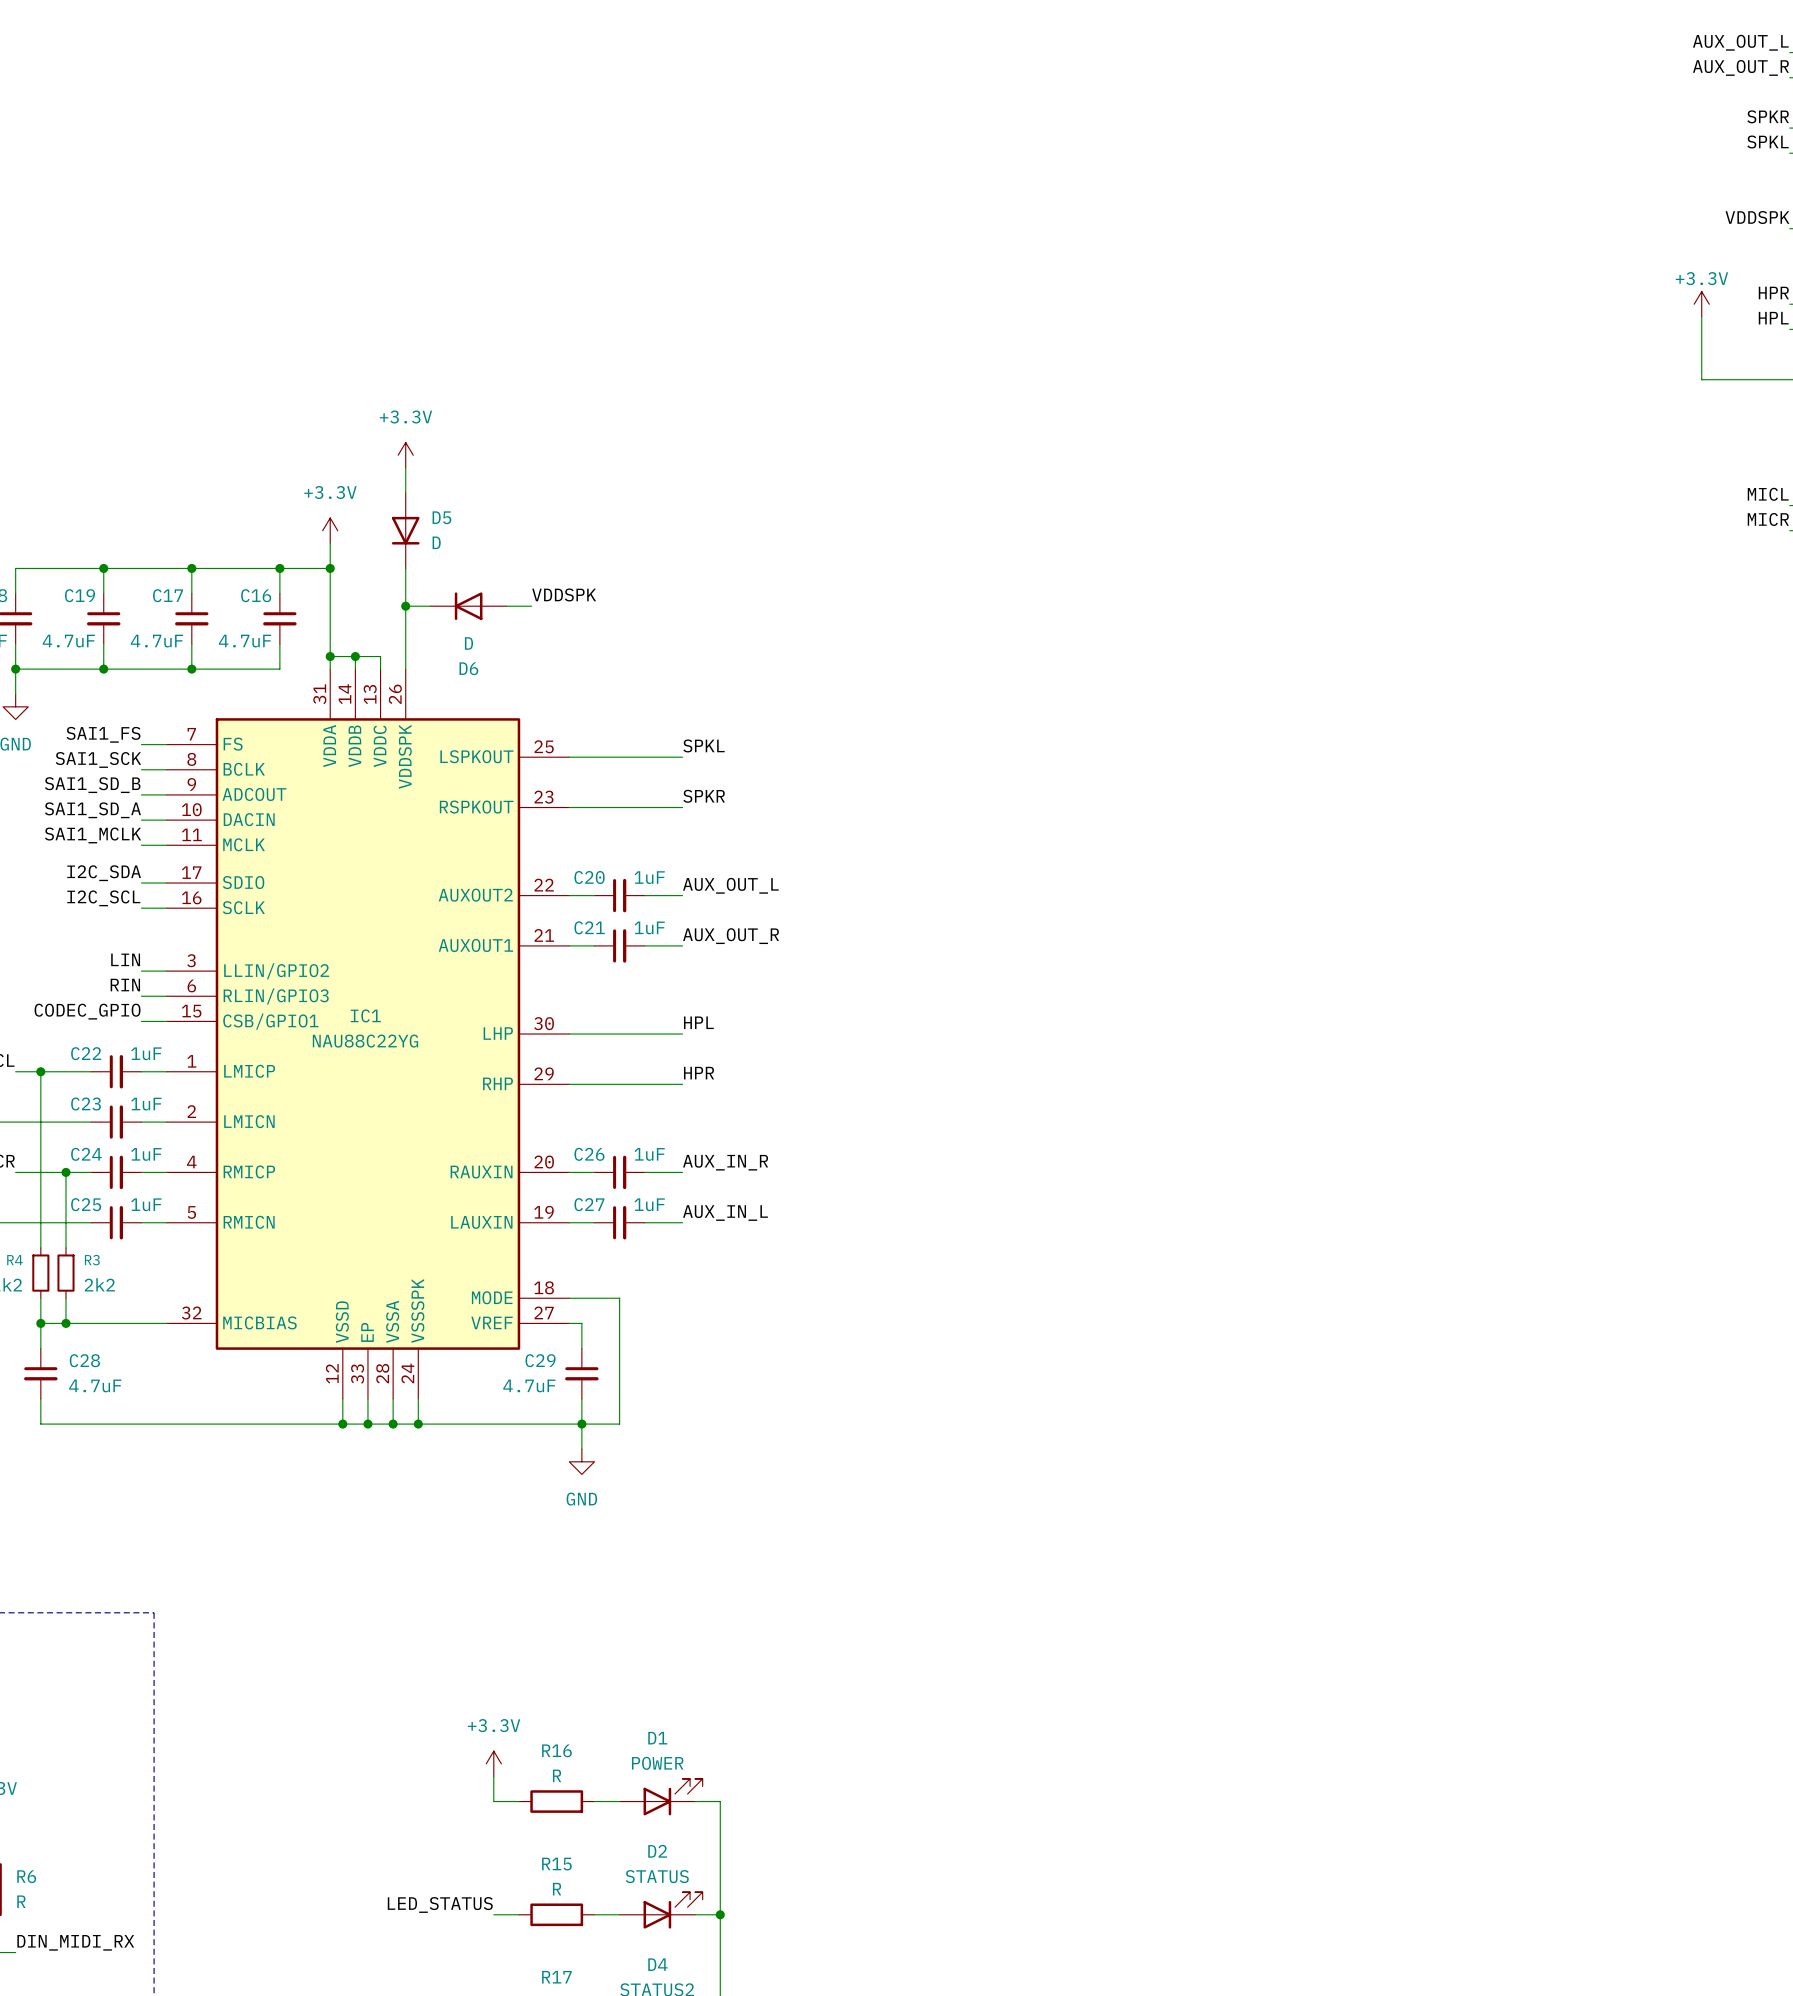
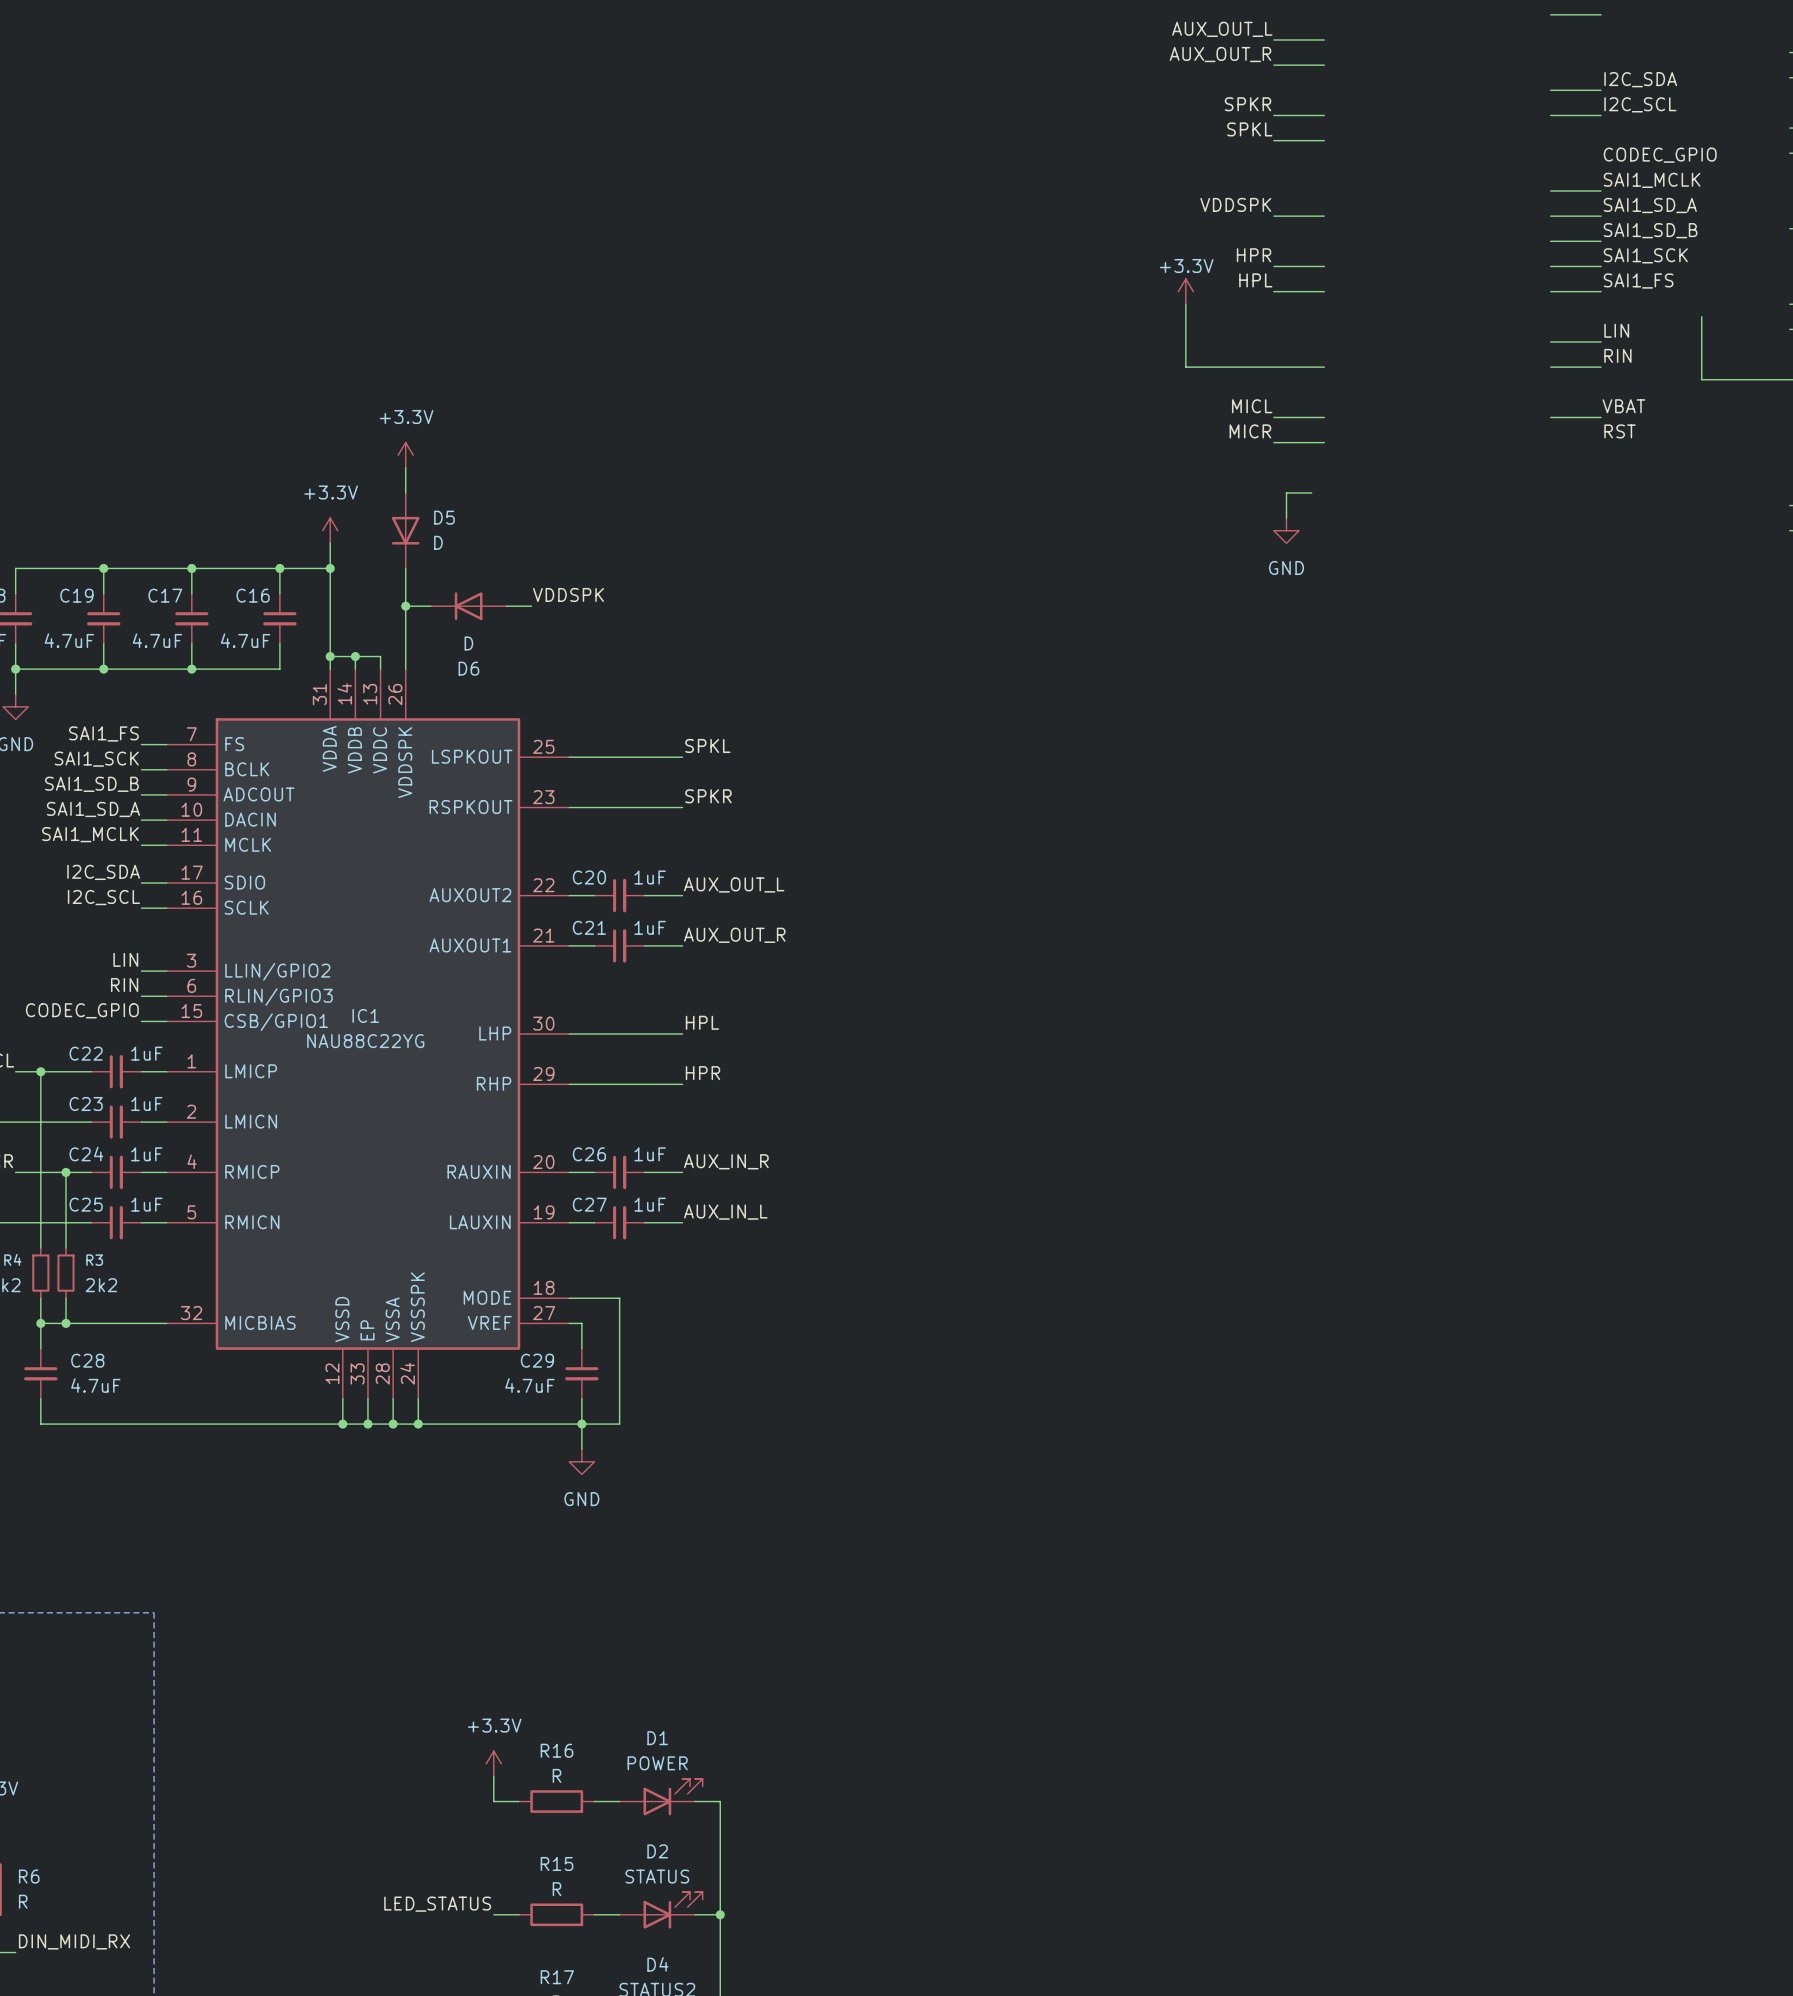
wire: none -> (1550, 14) (1601, 14)
label: none -> AUX_OUT_L (1222, 29)
wire: none -> (1273, 39) (1324, 39)
label: AUX_OUT_L (1740, 42) -> none
label: none -> AUX_OUT_R (1220, 54)
wire: none -> (1273, 65) (1324, 65)
label: AUX_OUT_R (1740, 67) -> none
label: none -> I2C_SDA (1640, 79)
wire: none -> (1550, 90) (1601, 90)
label: none -> SPKR (1248, 104)
label: none -> I2C_SCL (1640, 104)
wire: none -> (1273, 115) (1324, 115)
wire: none -> (1550, 115) (1601, 115)
label: SPKR (1768, 116) -> none
label: none -> SPKL (1249, 129)
wire: none -> (1273, 140) (1324, 140)
label: SPKL (1767, 142) -> none
label: none -> CODEC_GPIO (1660, 155)
label: none -> SAI1_MCLK (1652, 180)
wire: none -> (1550, 190) (1601, 190)
label: none -> VDDSPK (1235, 204)
label: none -> SAI1_SD_A (1650, 205)
wire: none -> (1273, 216) (1324, 216)
wire: none -> (1550, 216) (1601, 216)
label: VDDSPK (1757, 217) -> none
label: none -> SAI1_SD_B (1650, 230)
wire: none -> (1550, 241) (1601, 241)
label: none -> HPR (1254, 255)
label: none -> SAI1_SCK (1645, 255)
wire: none -> (1273, 266) (1324, 266)
wire: none -> (1550, 266) (1601, 266)
label: none -> HPL (1255, 280)
label: none -> SAI1_FS (1638, 281)
power symbol: none -> +3.3V (1185, 291)
wire: none -> (1273, 291) (1324, 291)
wire: none -> (1550, 291) (1601, 291)
label: HPR (1773, 292) -> none
wire: none -> (1185, 304) (1185, 367) (1324, 367)
power symbol: +3.3V (1701, 304) -> none
label: HPL (1773, 318) -> none
label: none -> LIN (1616, 330)
wire: none -> (1550, 341) (1601, 341)
label: none -> RIN (1617, 355)
wire: none -> (1550, 367) (1601, 367)
label: none -> MICL (1252, 406)
label: none -> VBAT (1623, 406)
wire: none -> (1273, 417) (1324, 417)
wire: none -> (1550, 417) (1601, 417)
label: none -> MICR (1250, 431)
label: none -> RST (1620, 431)
wire: none -> (1273, 442) (1324, 442)
wire: none -> (1311, 492) (1286, 492) (1286, 518)
label: MICL (1768, 494) -> none
label: MICR (1768, 519) -> none
power symbol: none -> GND (1286, 530)

